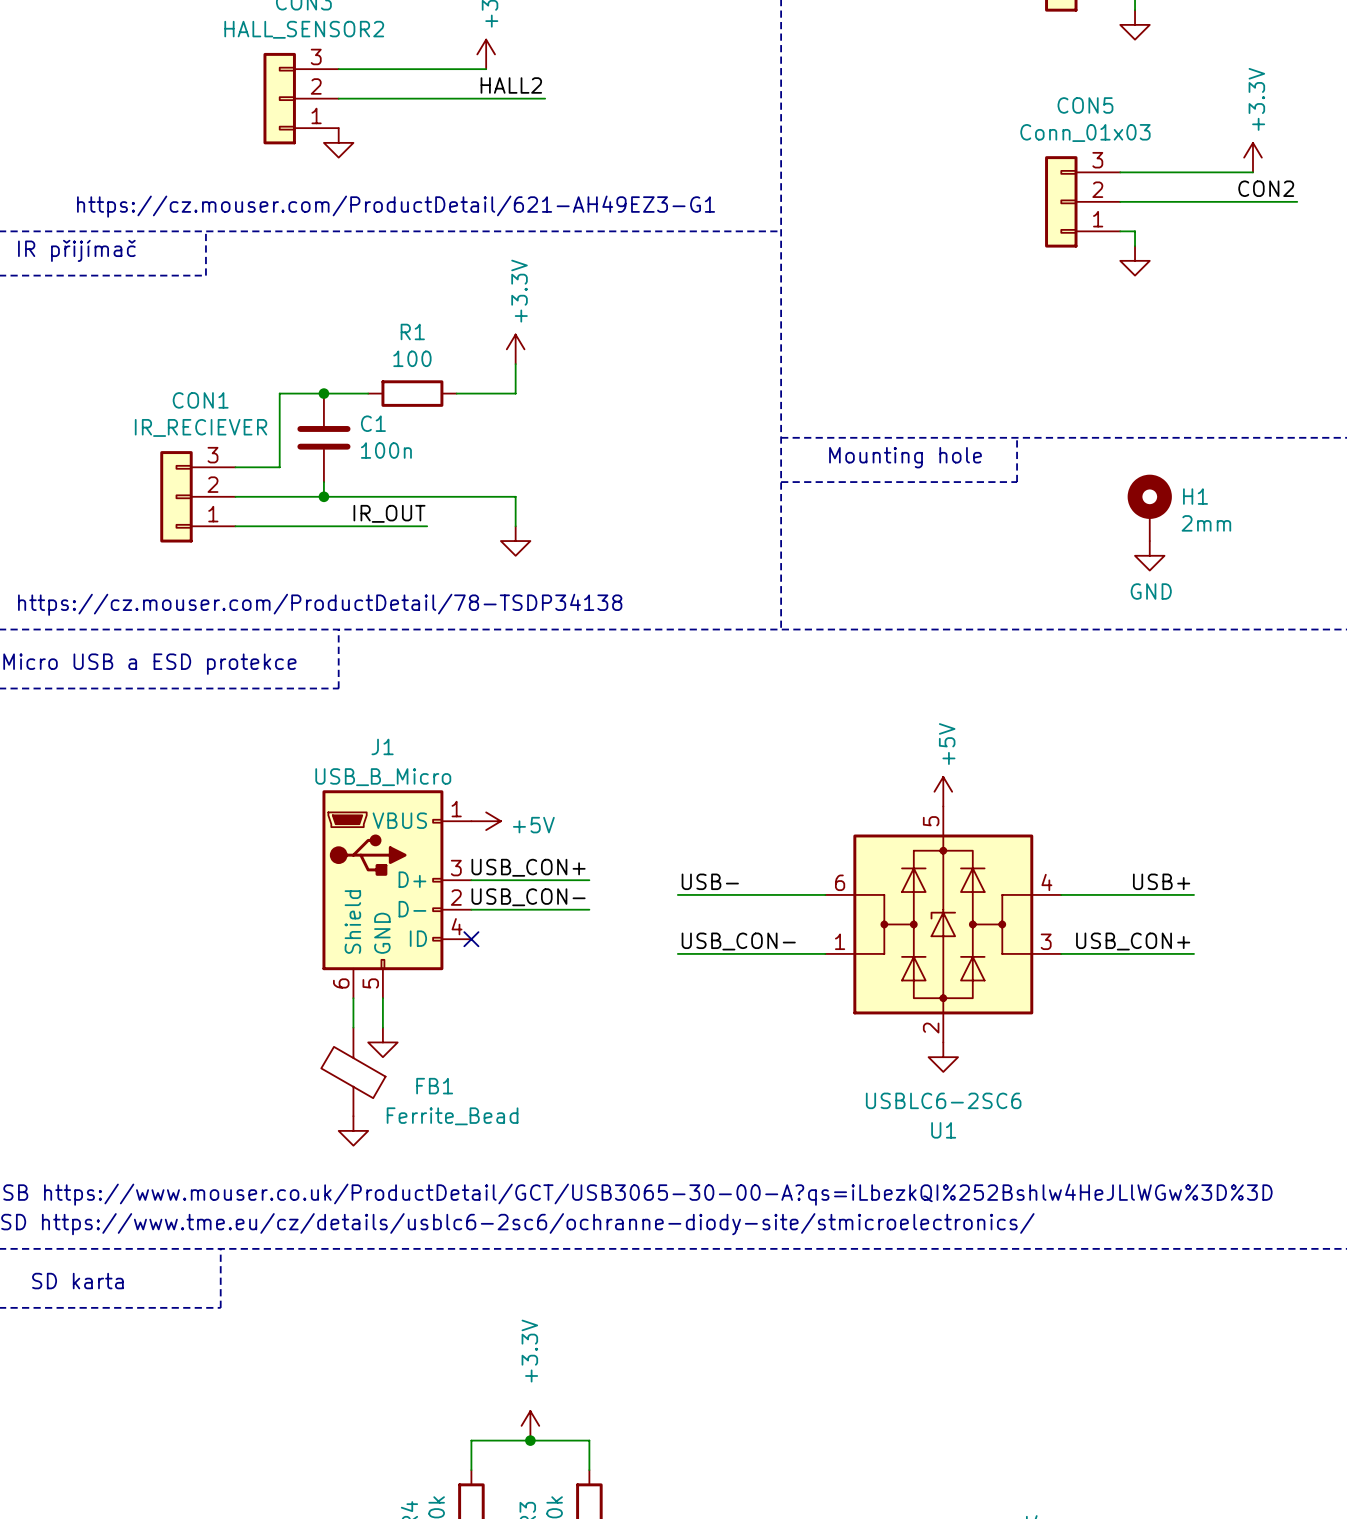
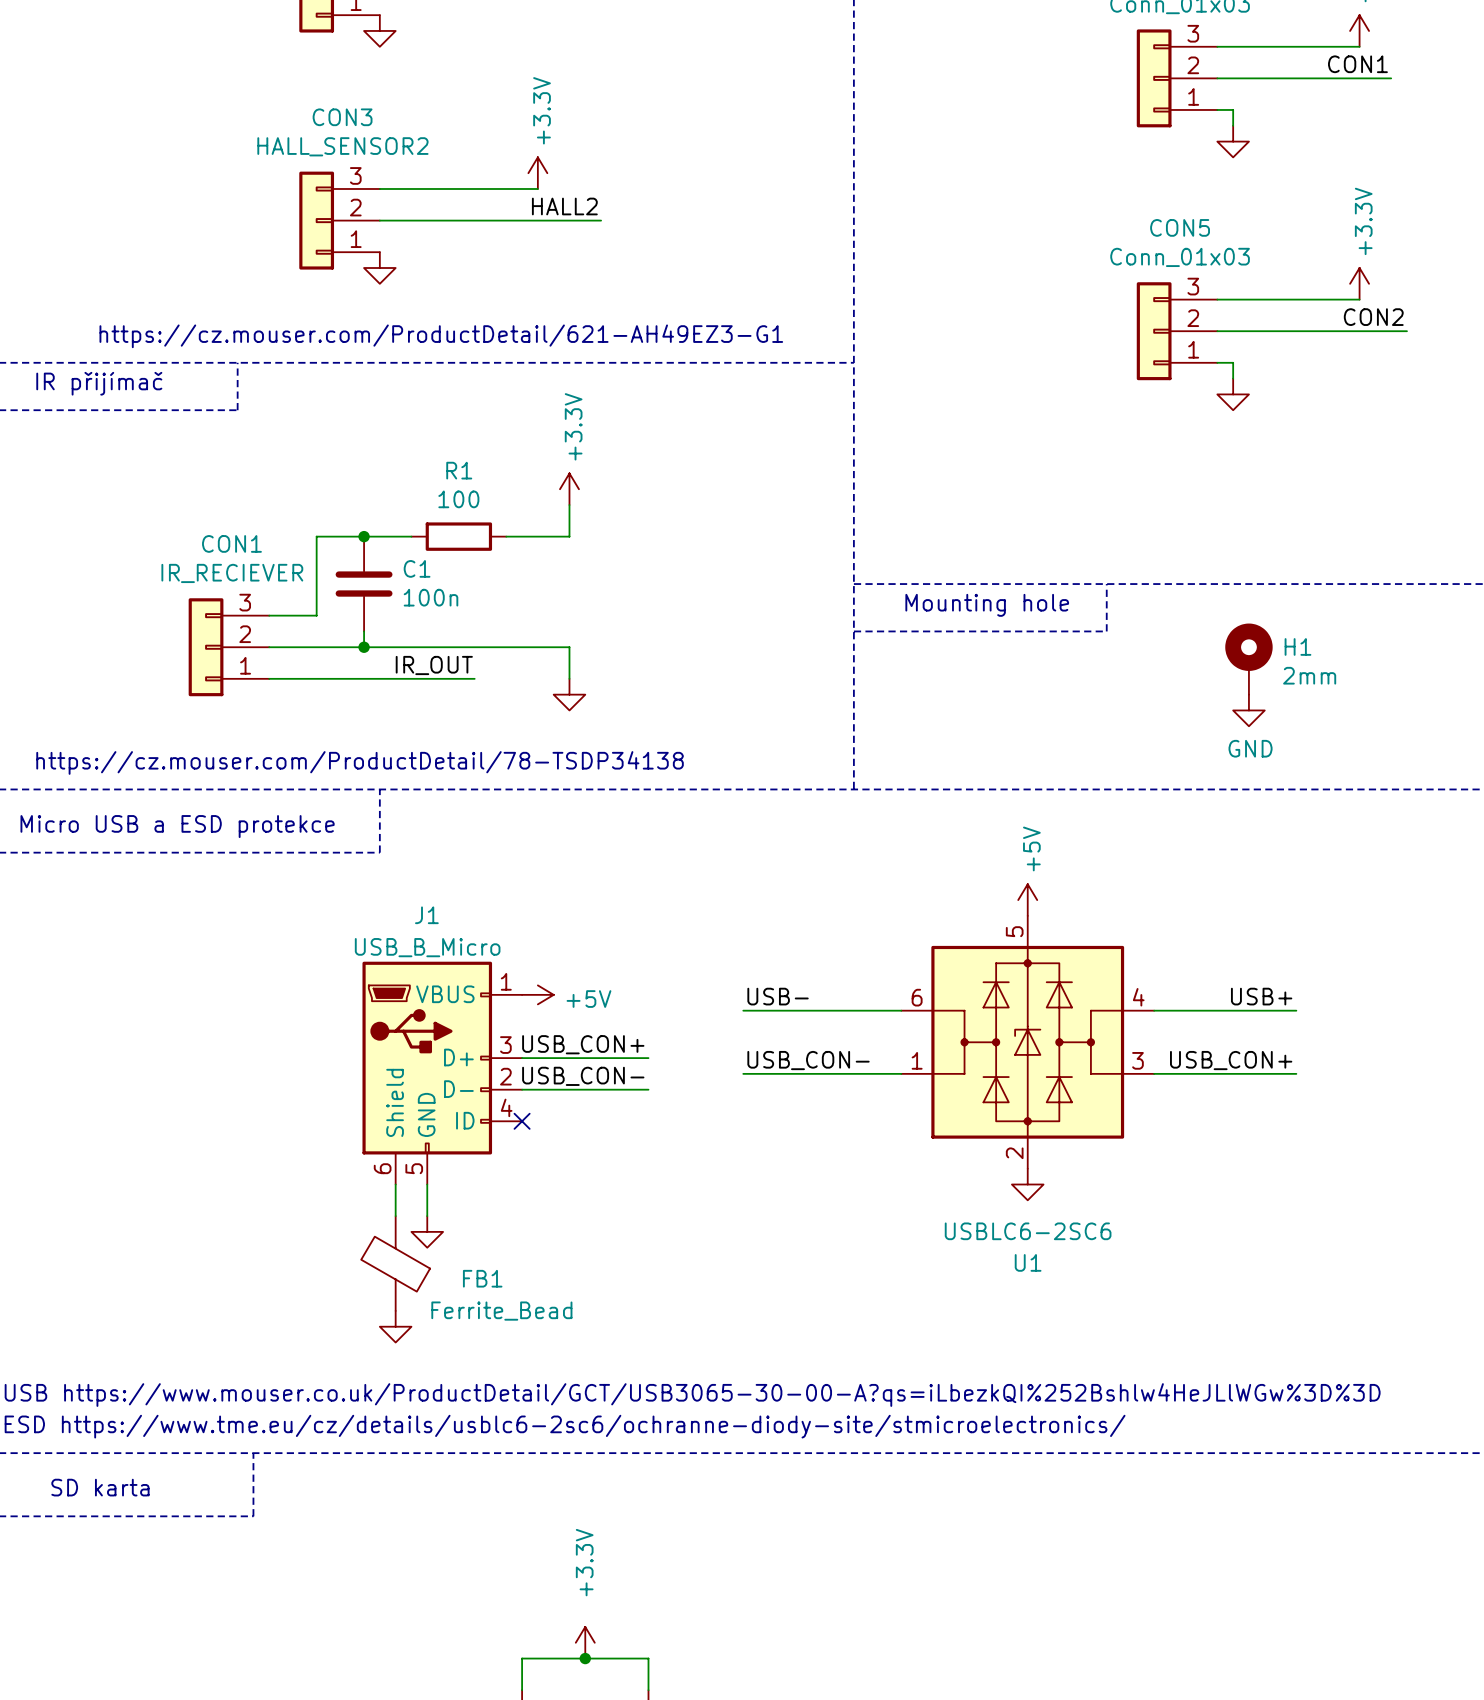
power symbol position: +5V (943, 791) -> +5V (1027, 900)
label: none -> USB- (778, 996)
label: none -> USB+ (1261, 996)
label: USB- (710, 881) -> USB_CON- (808, 1060)
label: USB+ (1161, 881) -> USB_CON+ (1231, 1060)
U1 position: (943, 924) -> (1027, 1042)
label: USB_CON- (738, 941) -> none
label: USB_CON+ (1133, 941) -> none
wire: (677, 953) (825, 953) -> (743, 1010) (901, 1010)
wire: (1061, 953) (1194, 953) -> (1154, 1010) (1296, 1010)
power symbol position: (943, 1057) -> (1027, 1184)

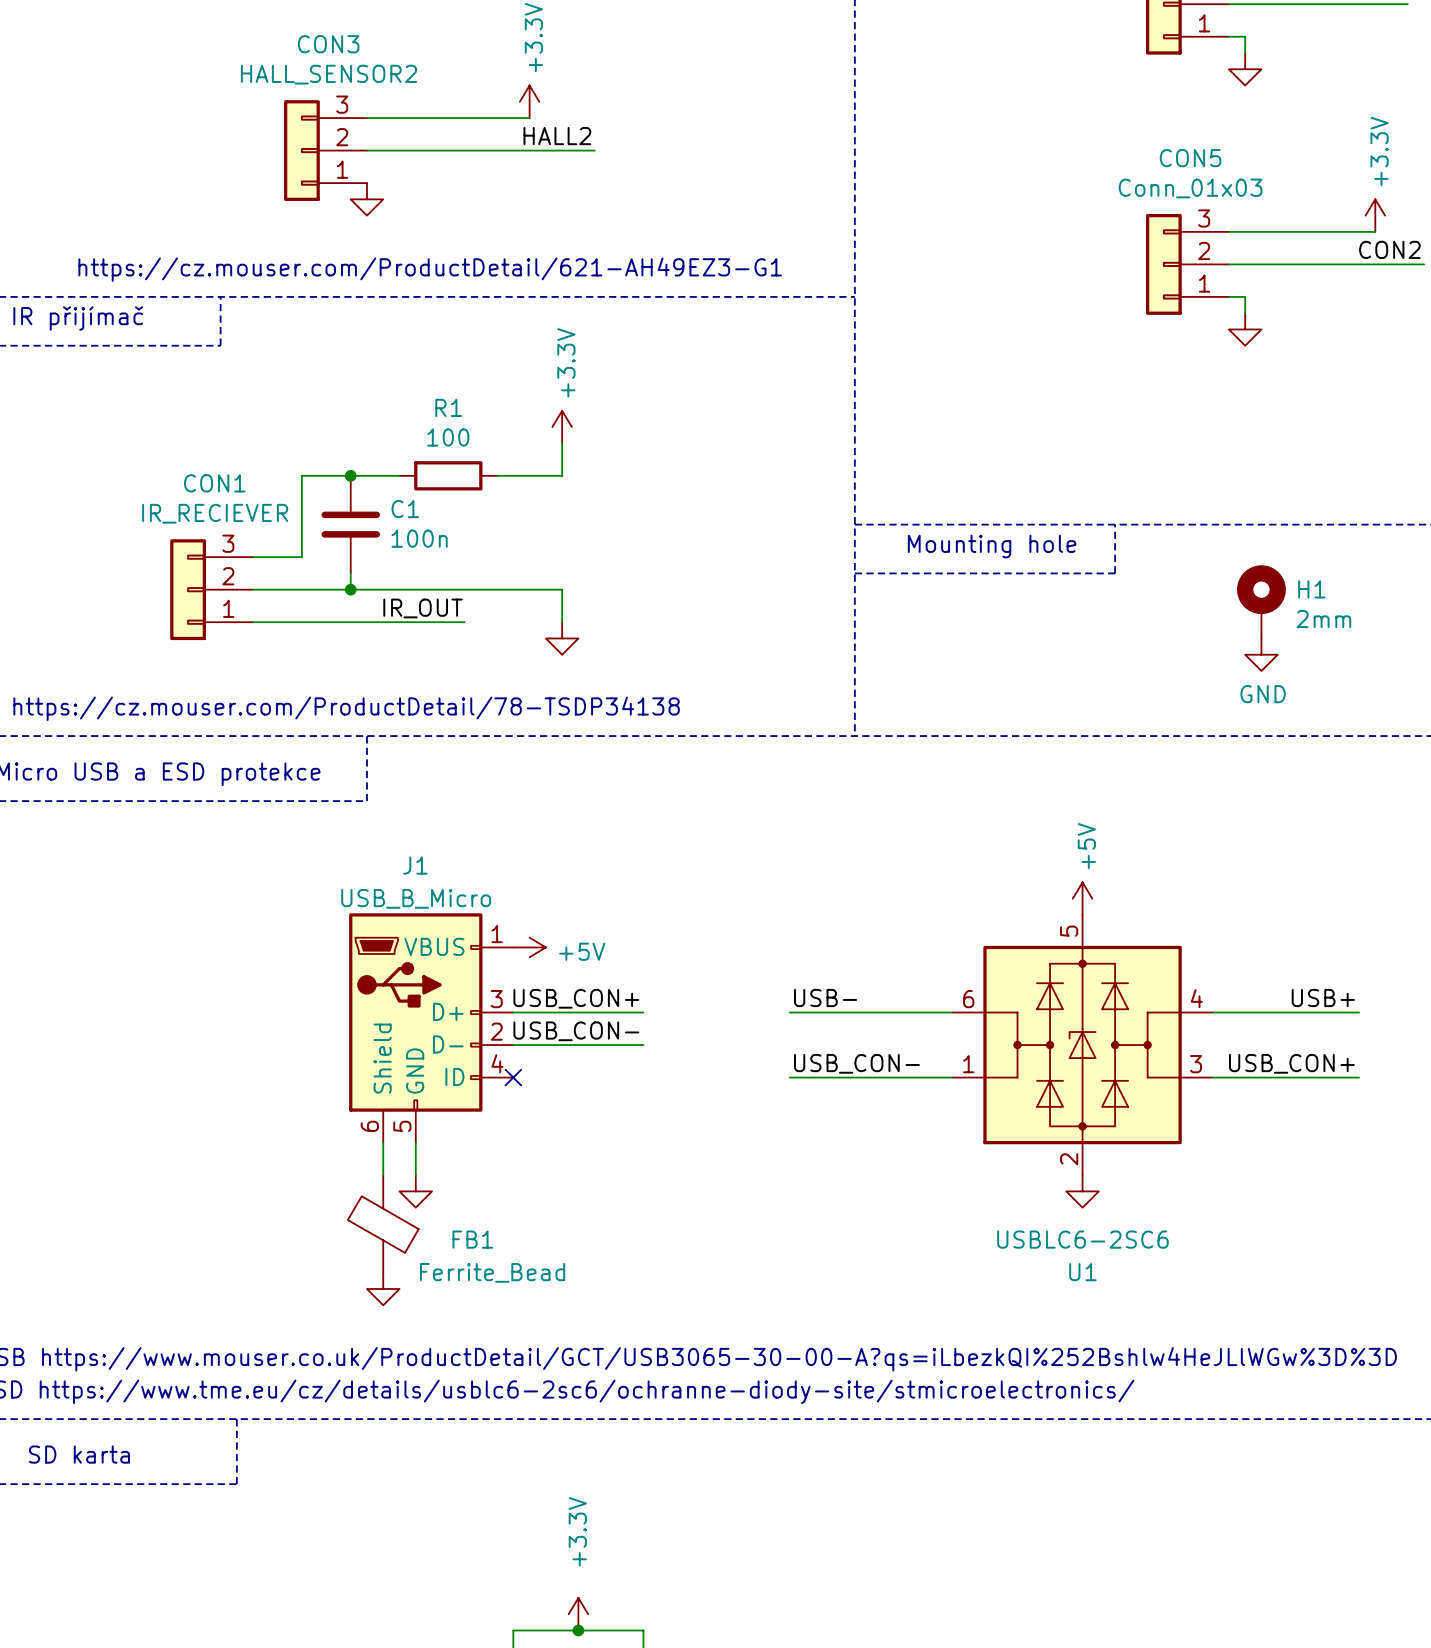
power symbol position: +5V (1027, 900) -> +5V (1082, 898)
label position: USB- (778, 996) -> USB- (825, 998)
label position: USB+ (1261, 996) -> USB+ (1323, 998)
wire: (743, 1010) (901, 1010) -> (789, 1012) (952, 1012)
wire: (1154, 1010) (1296, 1010) -> (1212, 1012) (1359, 1012)
U1 position: (1027, 1042) -> (1082, 1045)
label position: USB_CON- (808, 1060) -> USB_CON- (856, 1063)
label position: USB_CON+ (1231, 1060) -> USB_CON+ (1291, 1063)
wire: (743, 1073) (901, 1073) -> (789, 1077) (952, 1077)
wire: (1154, 1073) (1296, 1073) -> (1212, 1077) (1359, 1077)
power symbol position: (1027, 1184) -> (1082, 1191)

